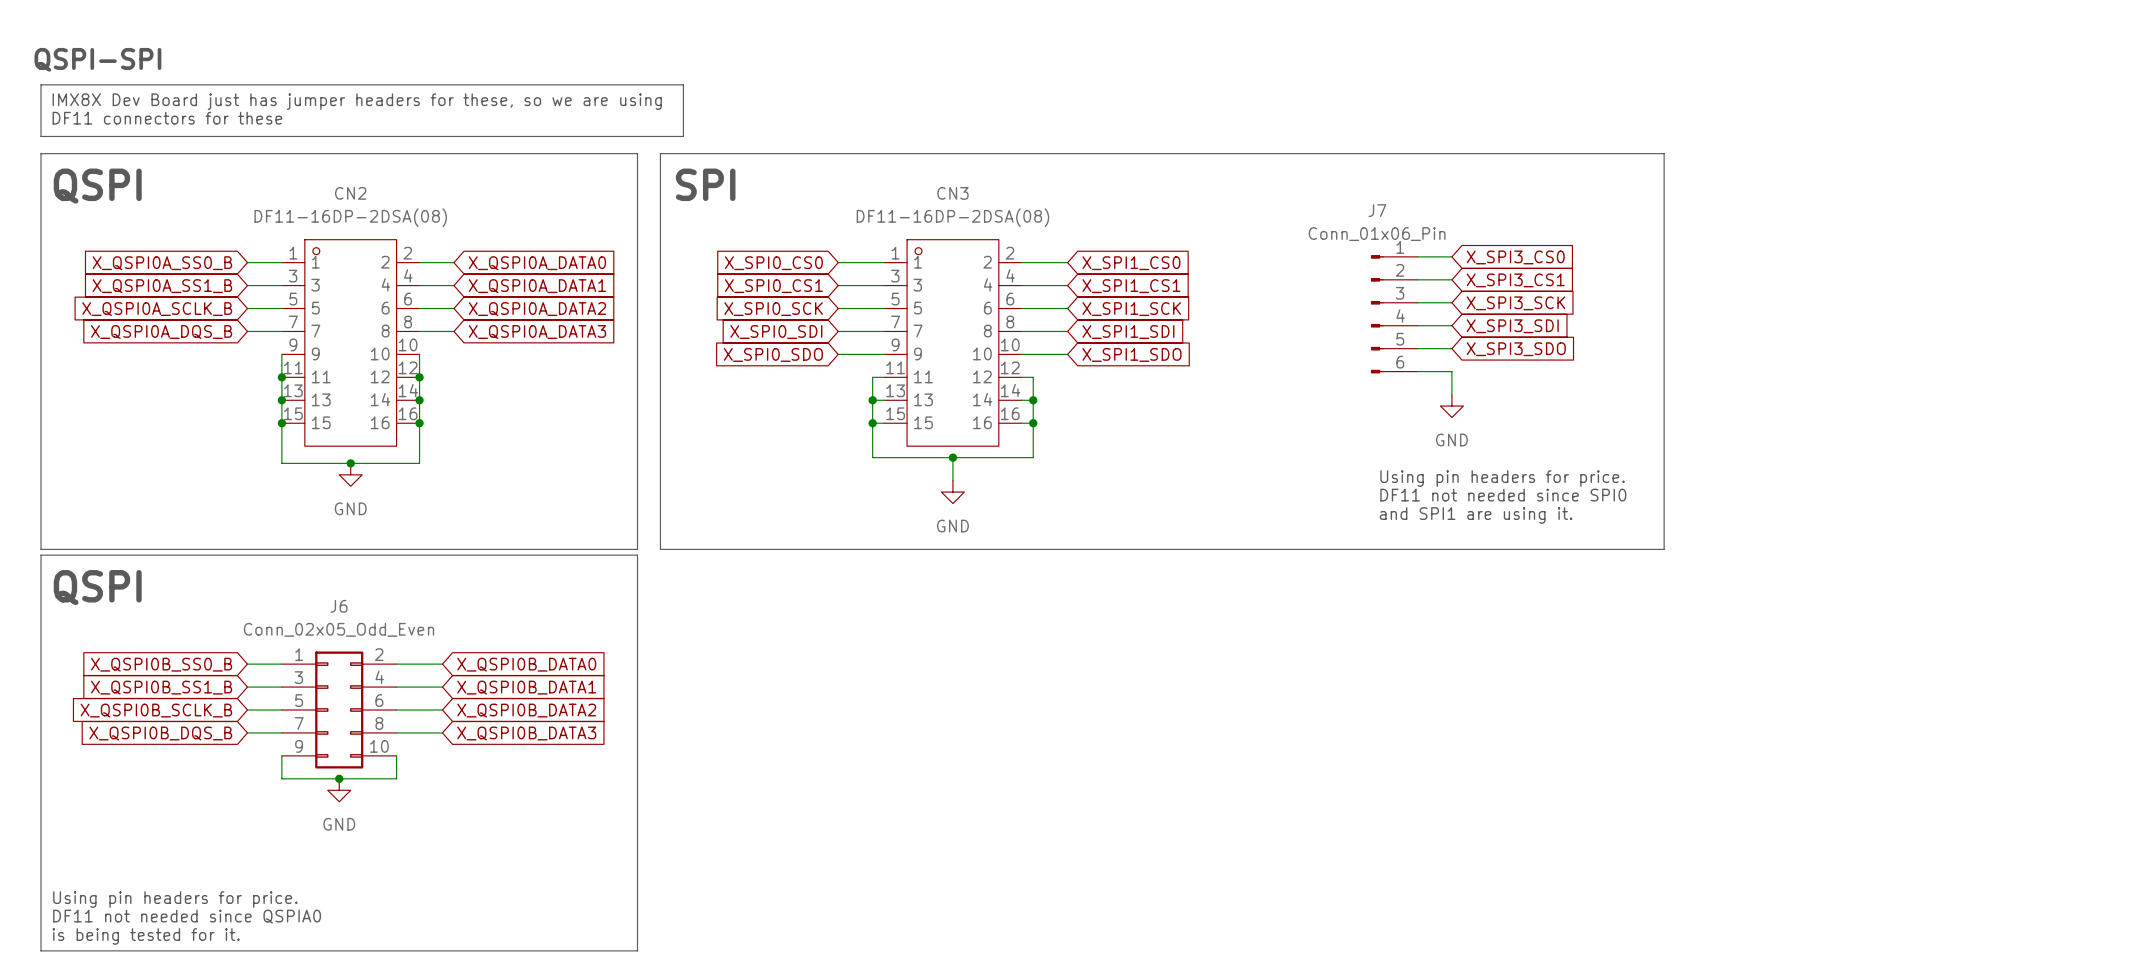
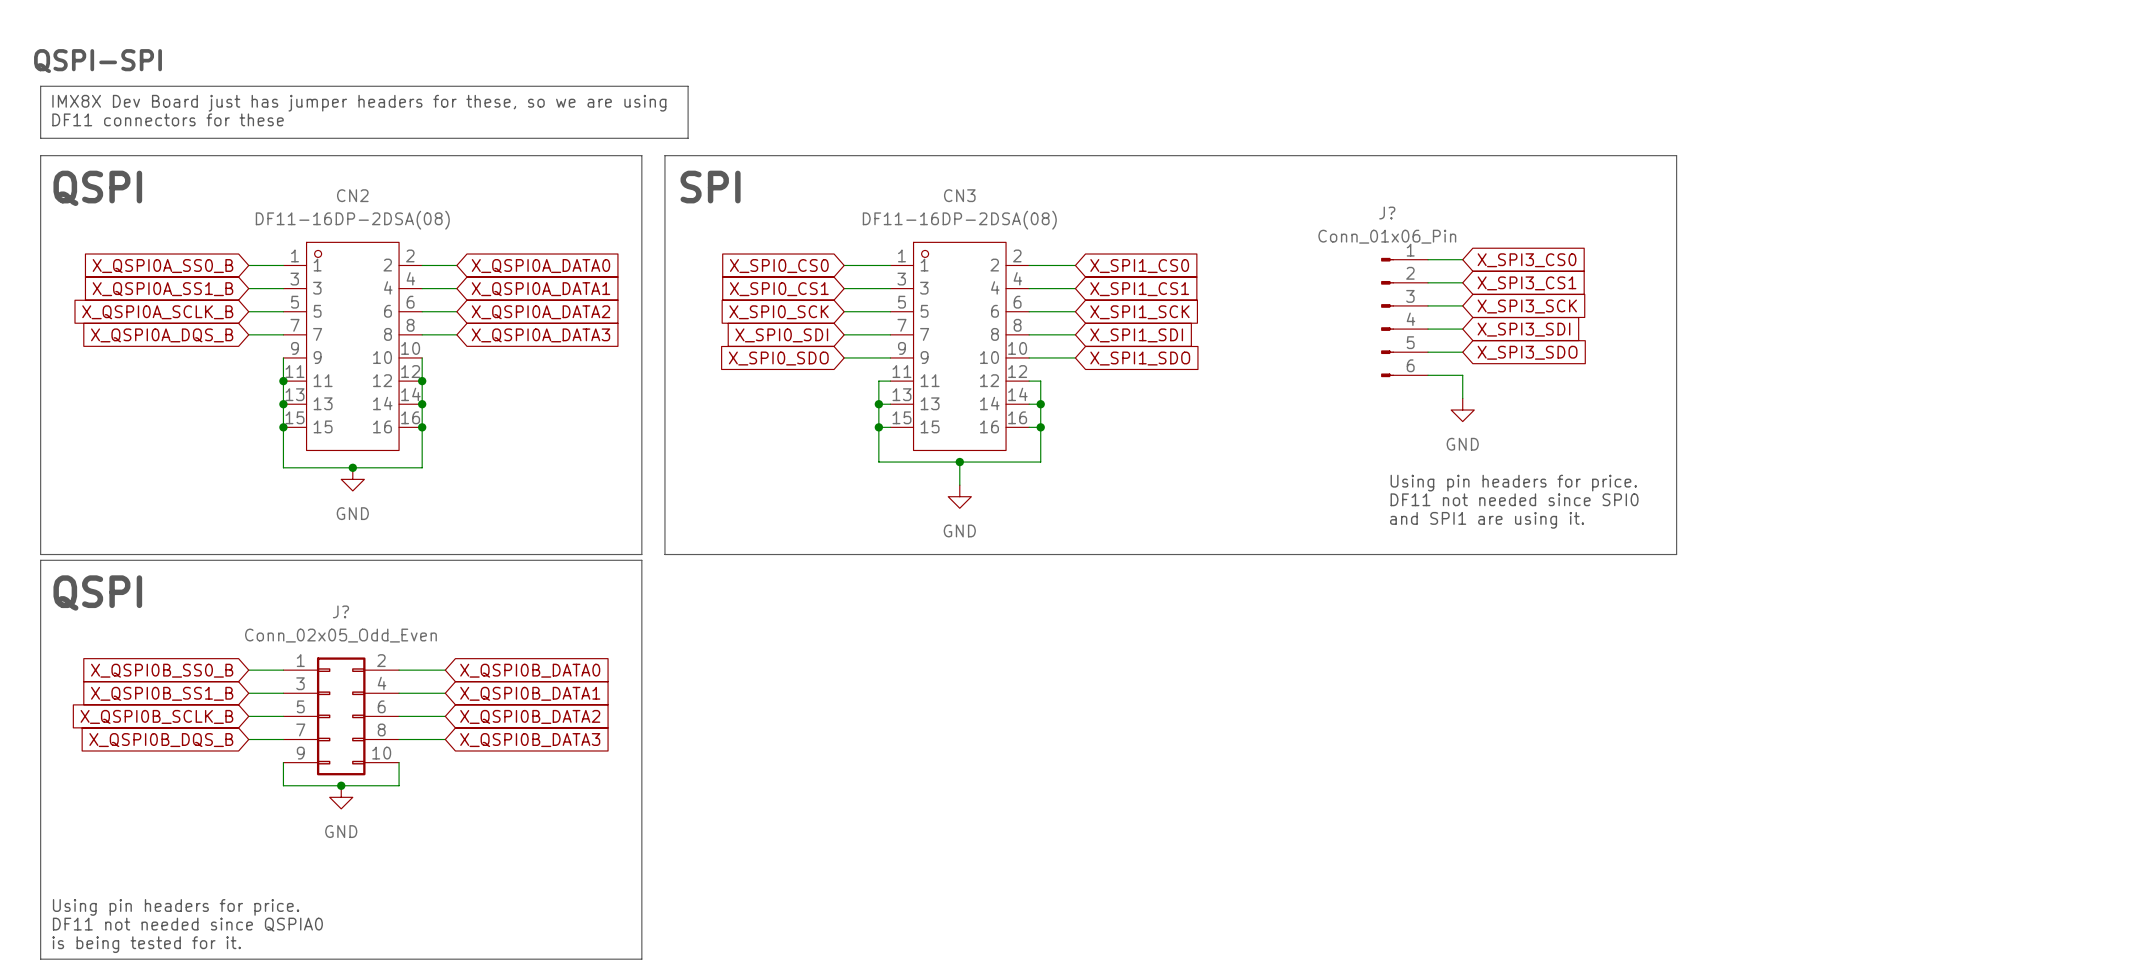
J7 name: J7 (1377, 210) -> J? (1387, 213)
J6 name: J6 (338, 606) -> J? (340, 611)

